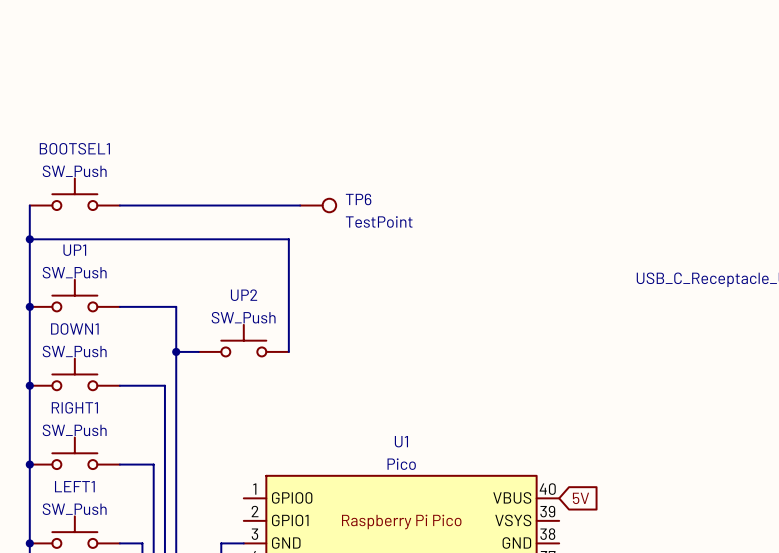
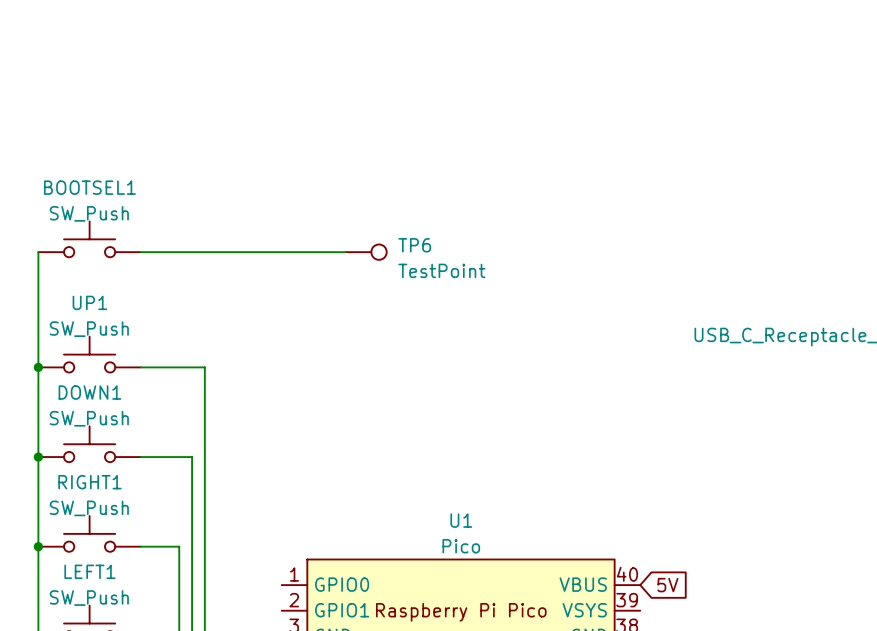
wire: (29, 239) (288, 239) (288, 351) -> none
junction: (29, 239) -> none
UP2: SW_Push (243, 340) -> none
wire: (176, 351) (198, 351) -> none
junction: (176, 351) -> none

